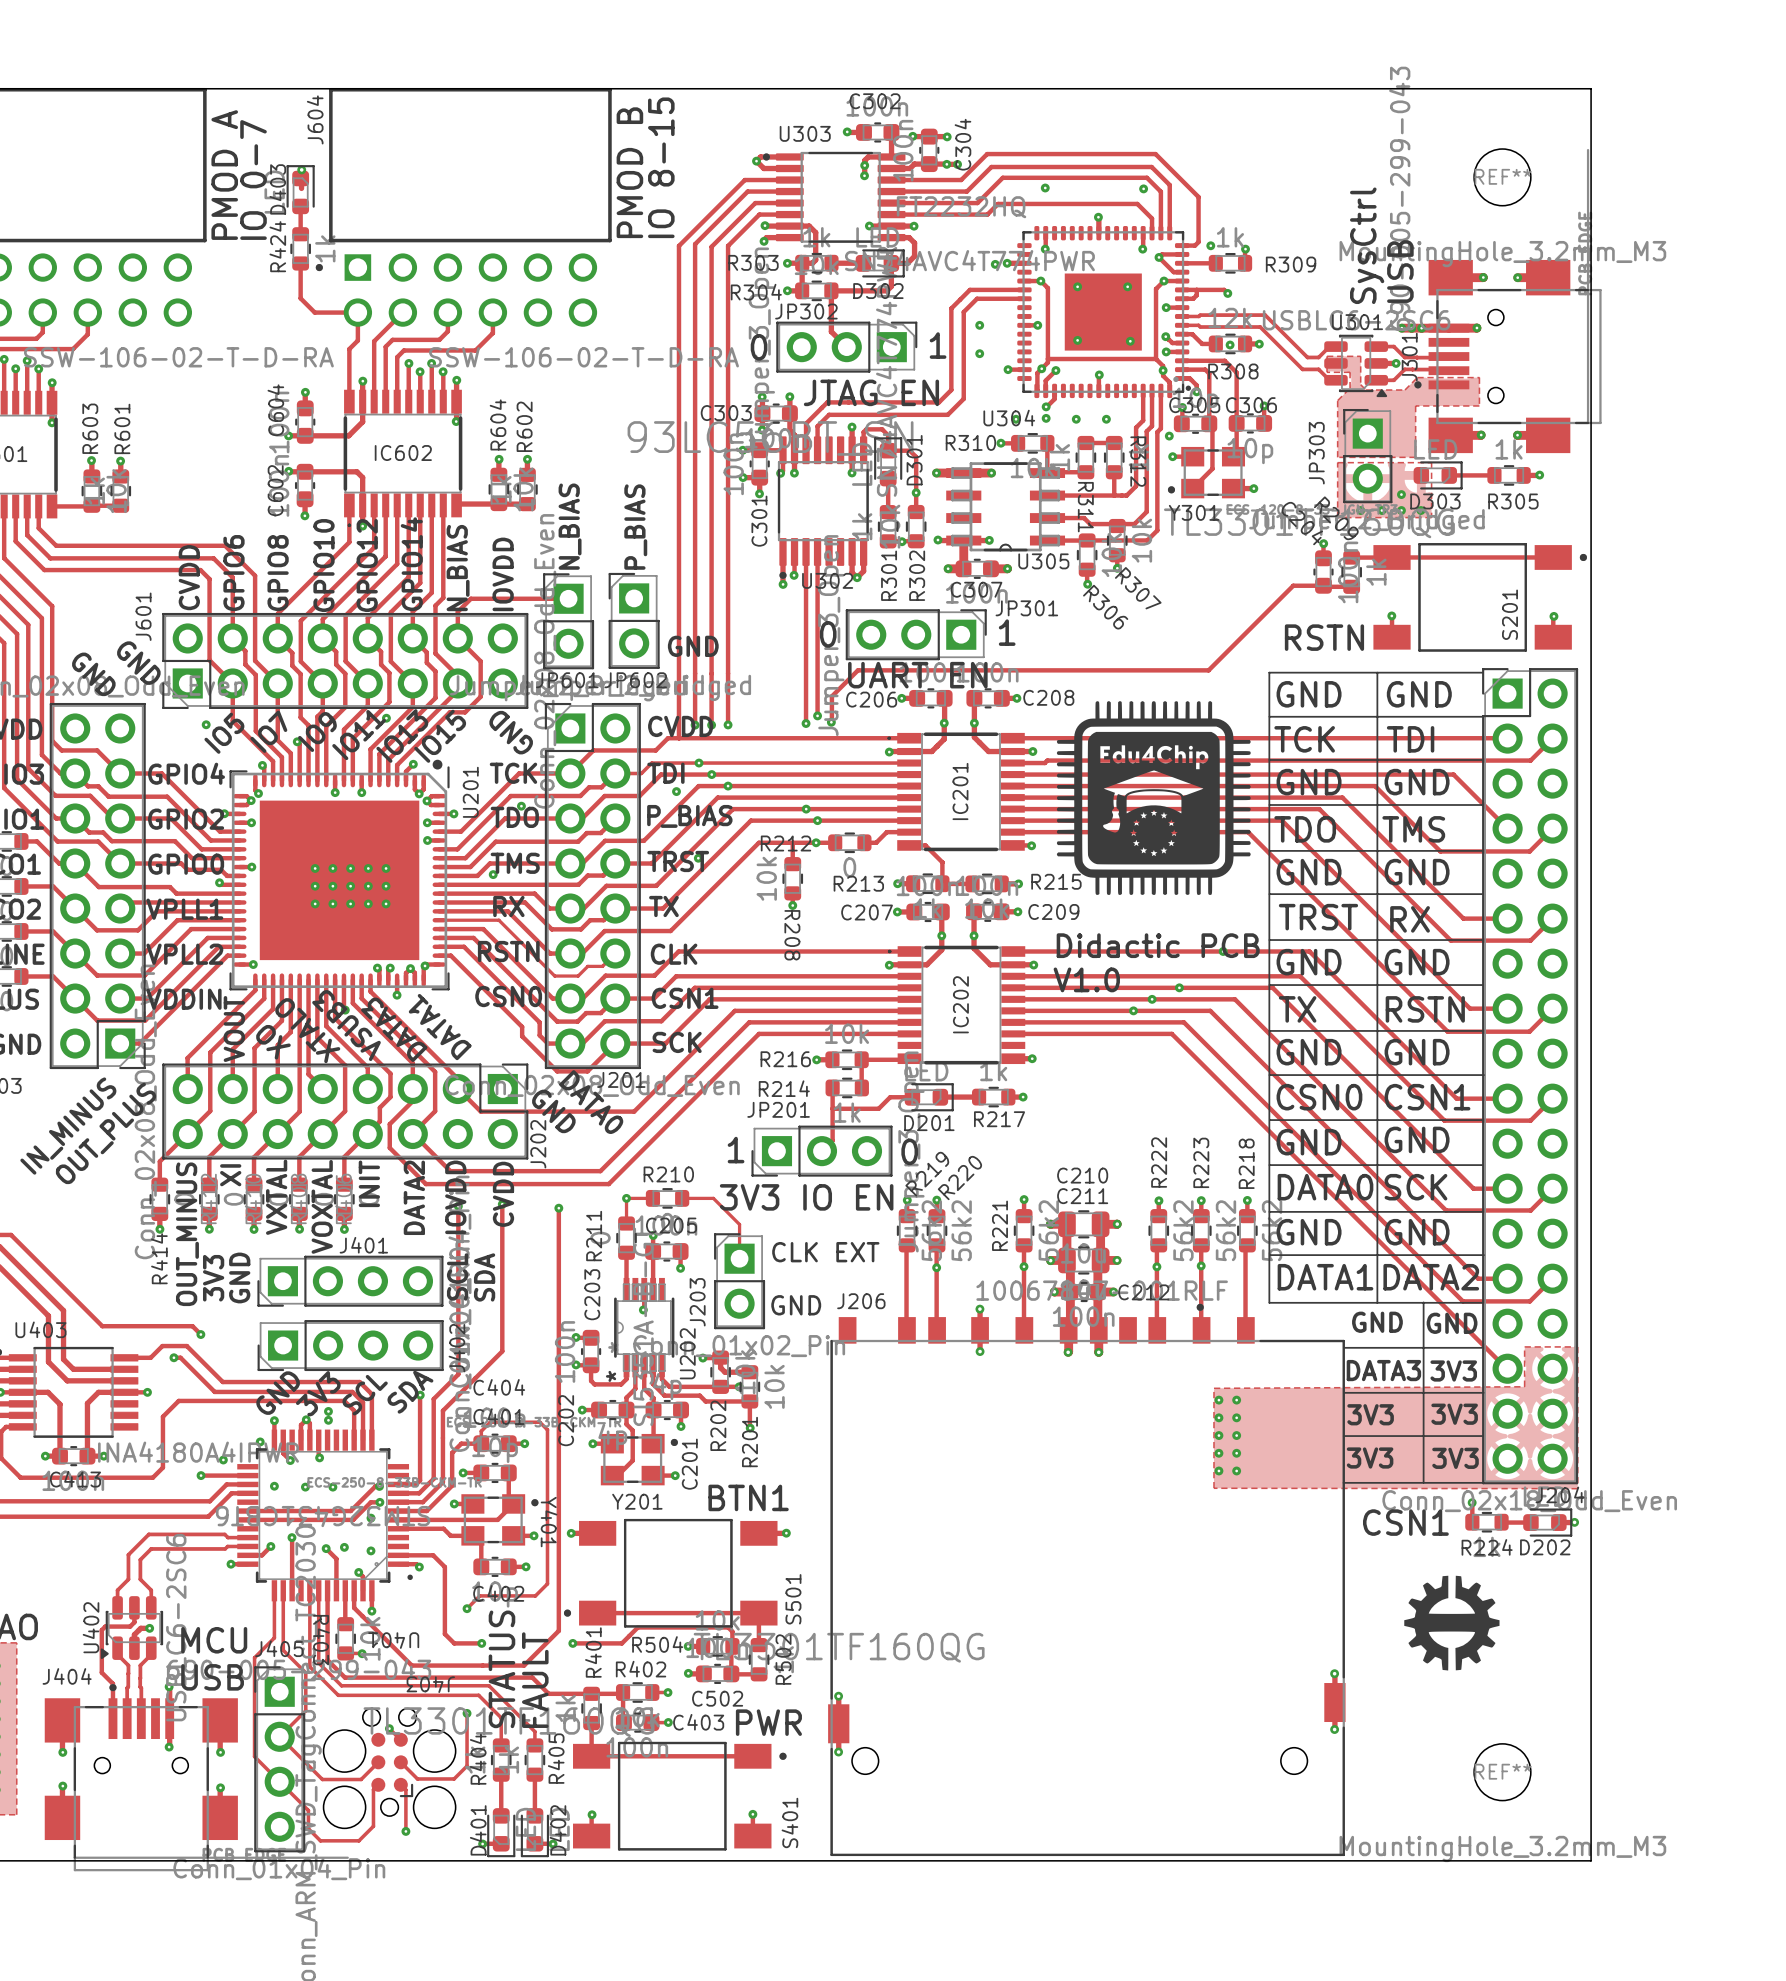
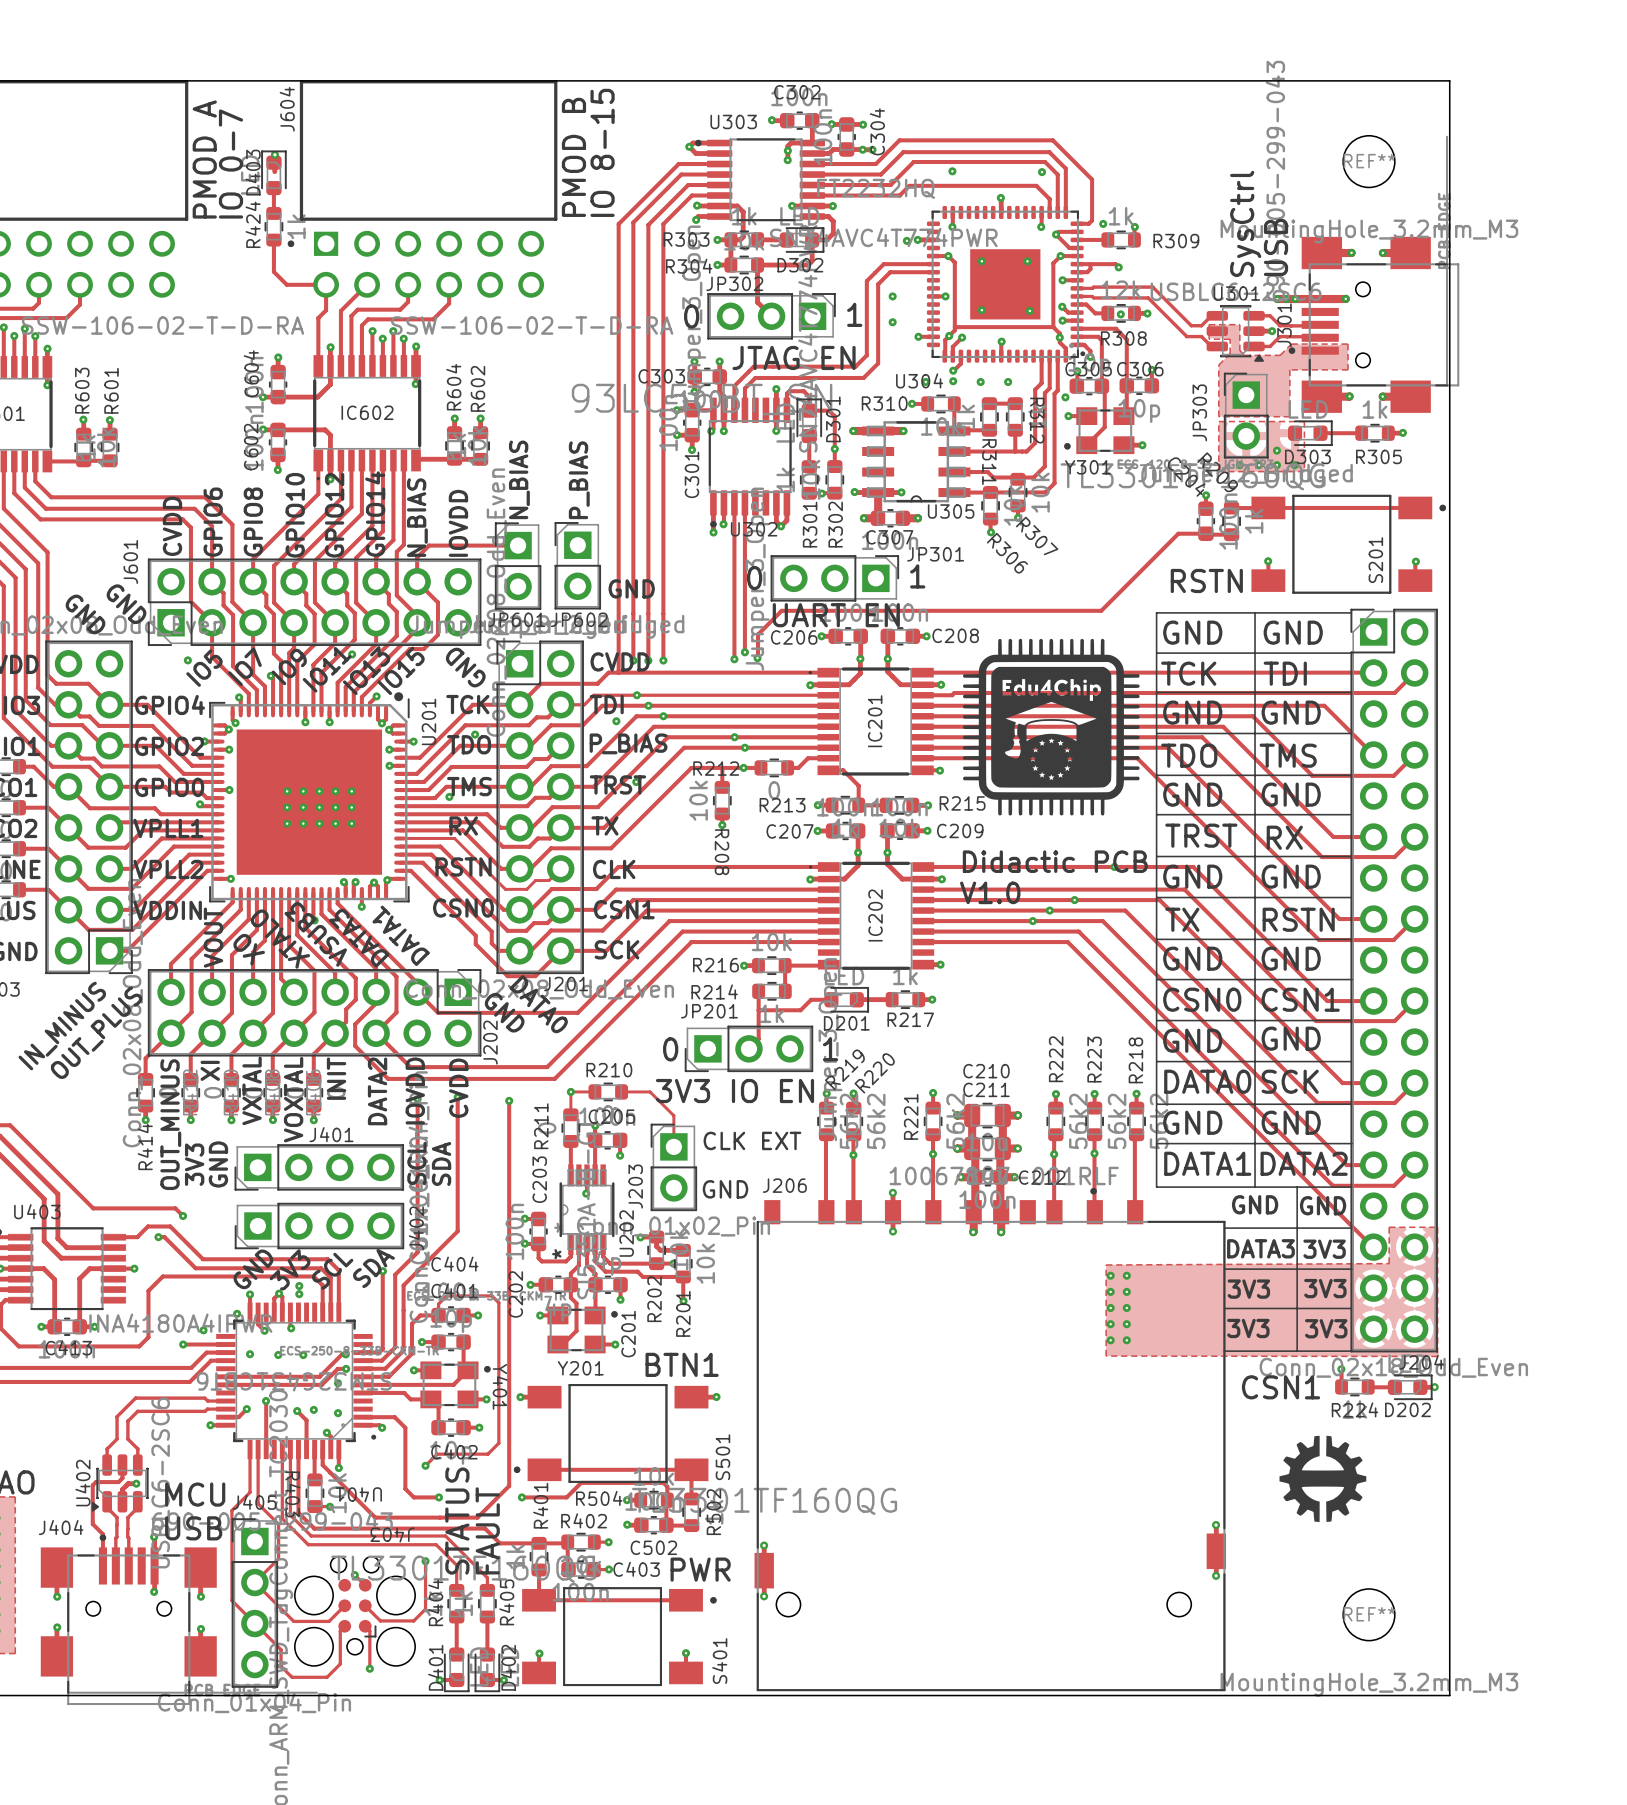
text: 1 (736, 1150) -> 0 (670, 1049)
text: 0 (909, 1151) -> 1 (830, 1049)

